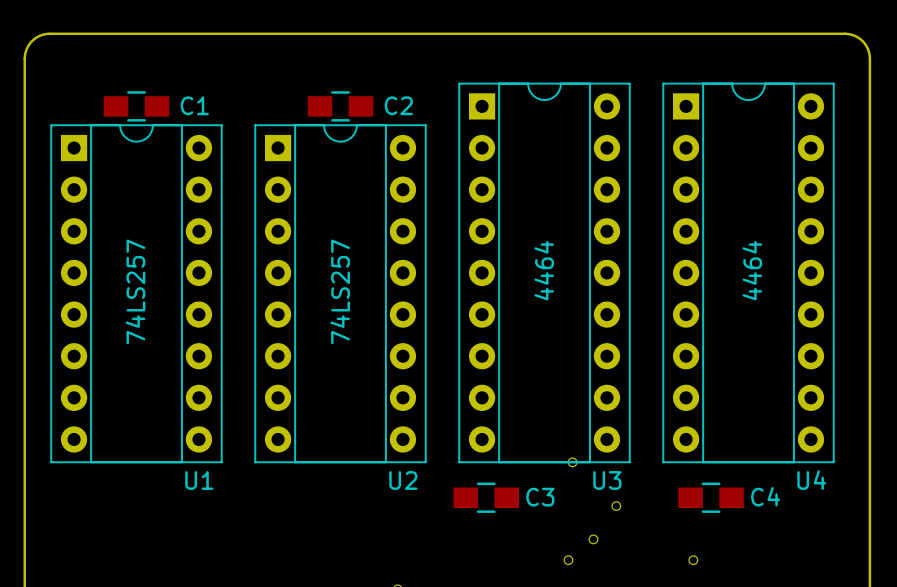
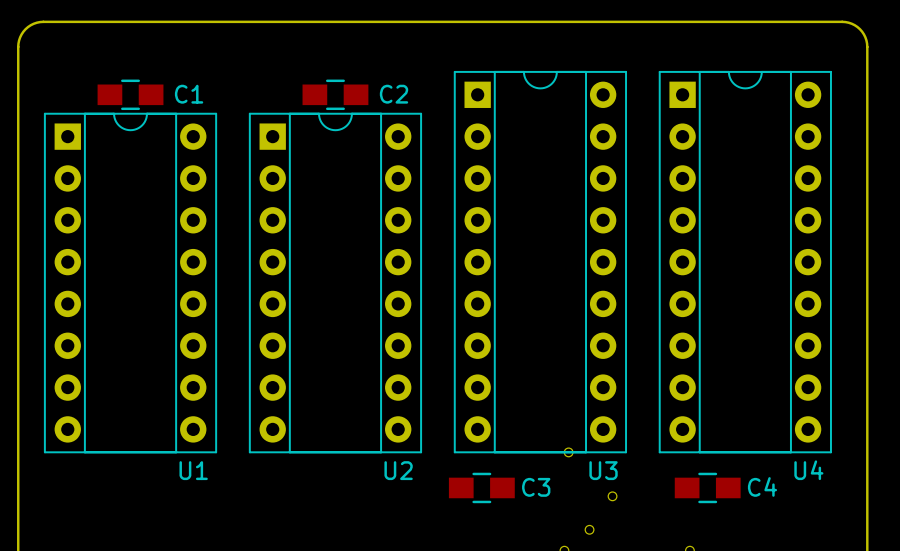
U3 value: 4464 (544, 270) -> none
U4 value: 4464 (752, 270) -> none
U1 value: 74LS257 (135, 291) -> none
U2 value: 74LS257 (340, 291) -> none

